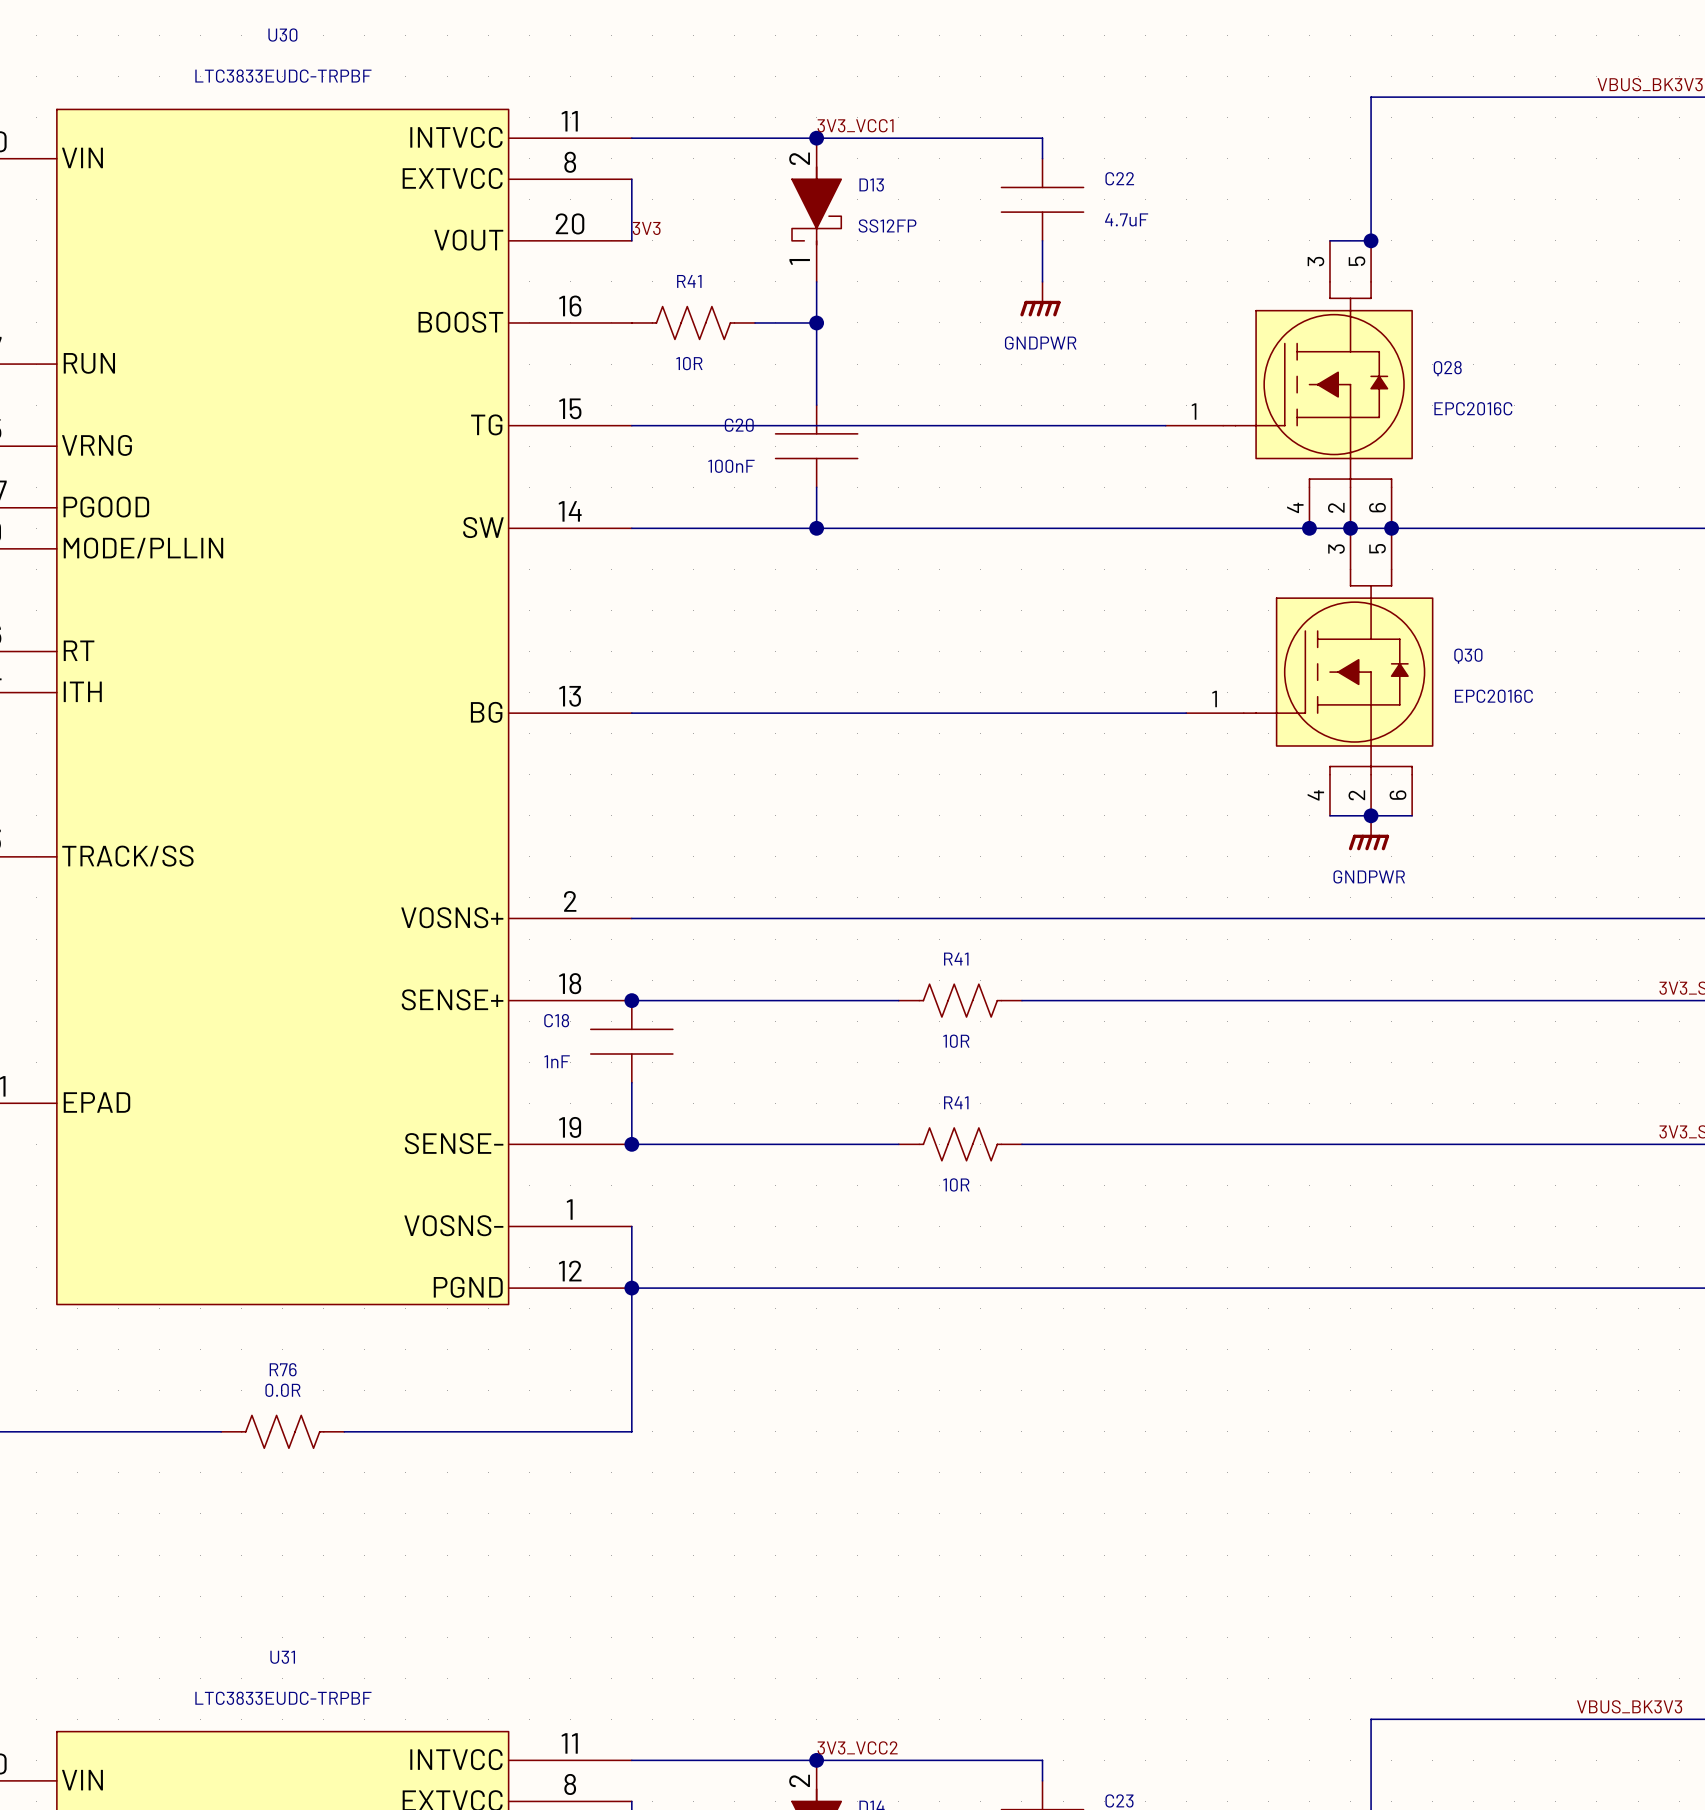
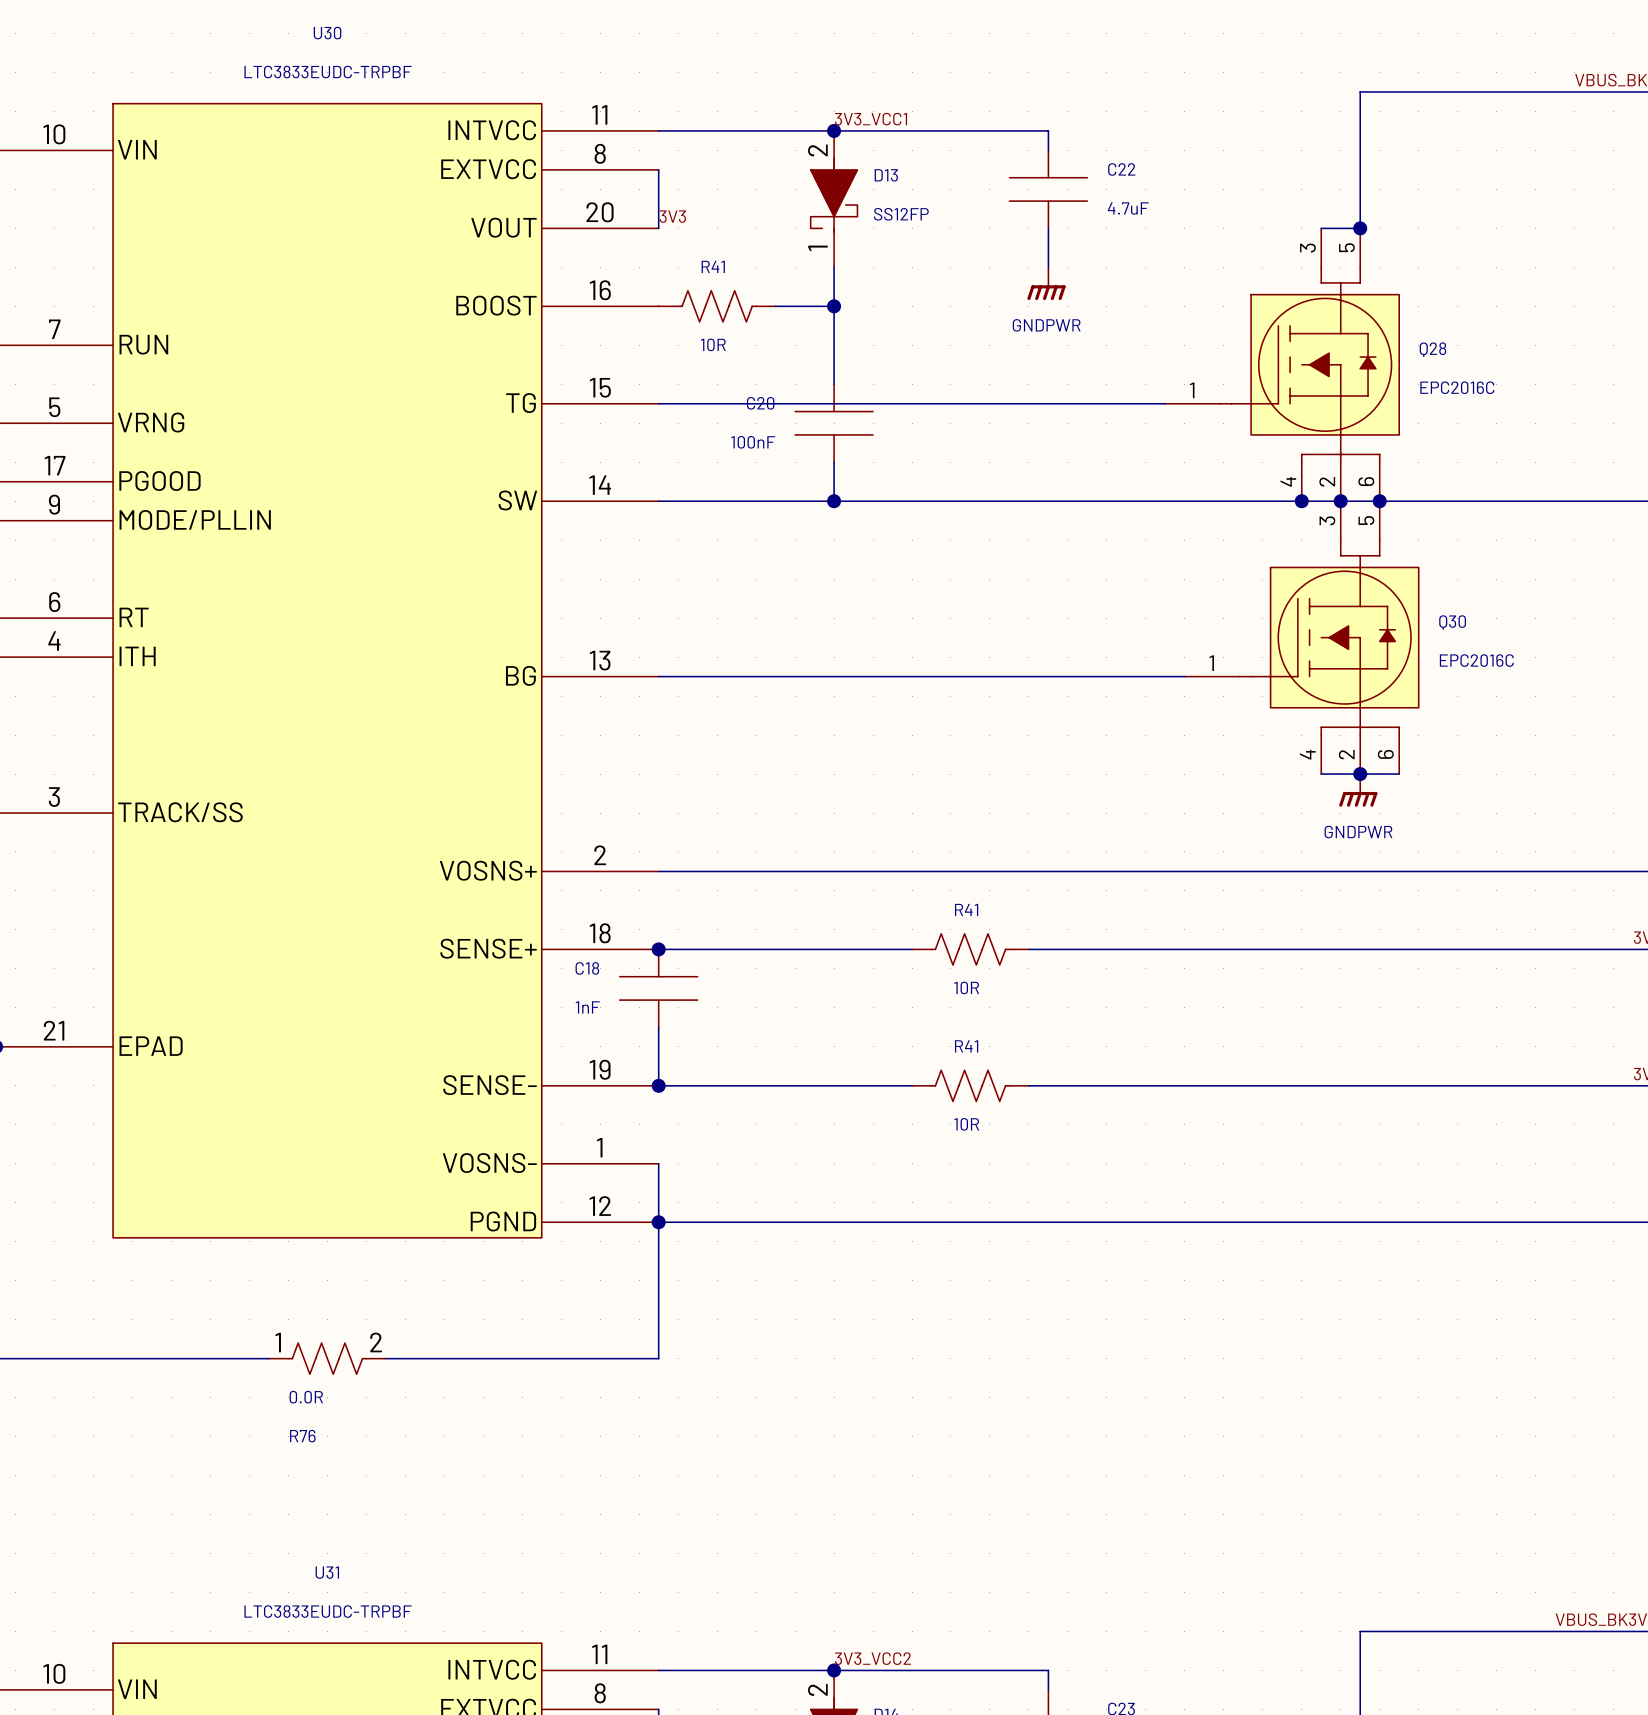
R76 name position: R76 (283, 1369) -> R76 (302, 1436)
R76 value position: 0.0R (282, 1390) -> 0.0R (306, 1397)
R76 pin number: none -> 1 (278, 1342)
R76 pin number: none -> 2 (376, 1342)

